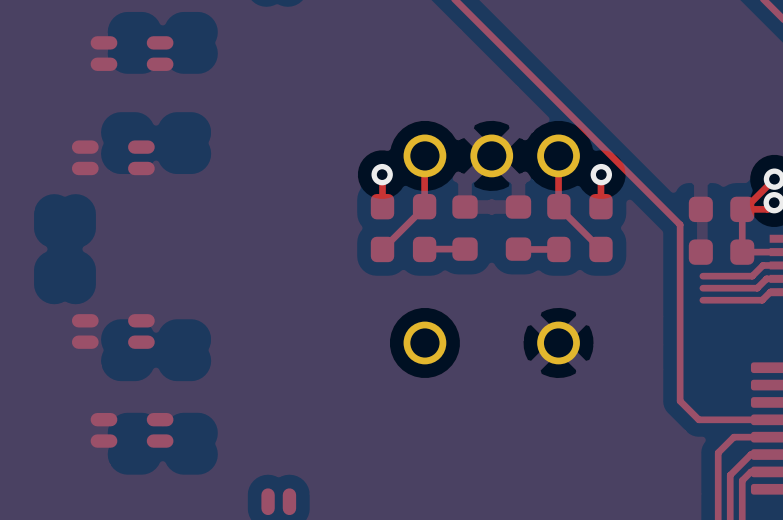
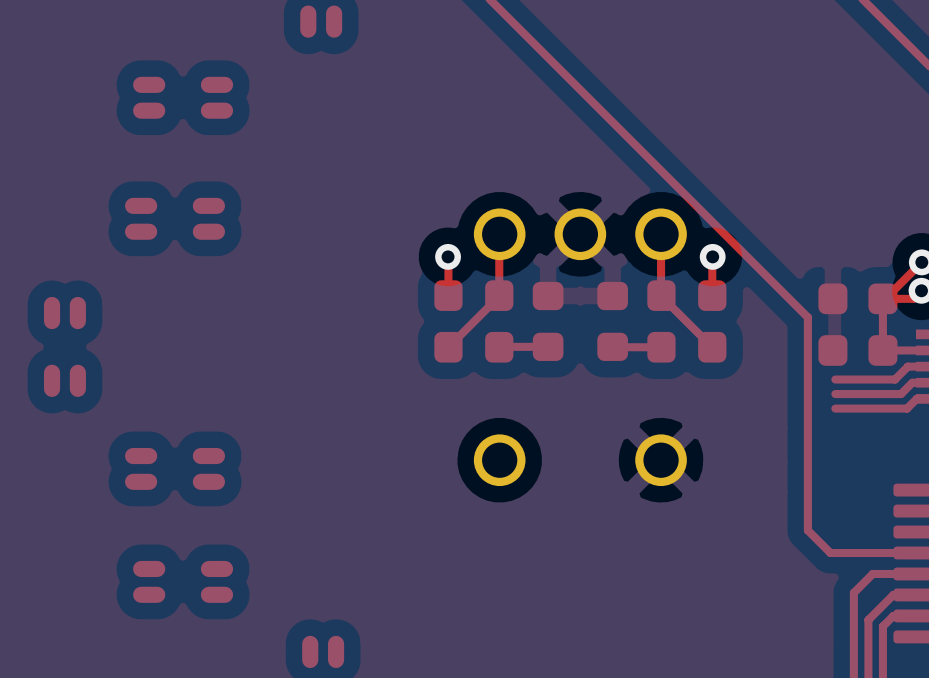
part position: (132, 53) -> (183, 97)
part position: (113, 157) -> (175, 218)
part: none -> (64, 346)
part: (113, 331) -> none
part: none -> (175, 468)
part position: (132, 430) -> (183, 581)

